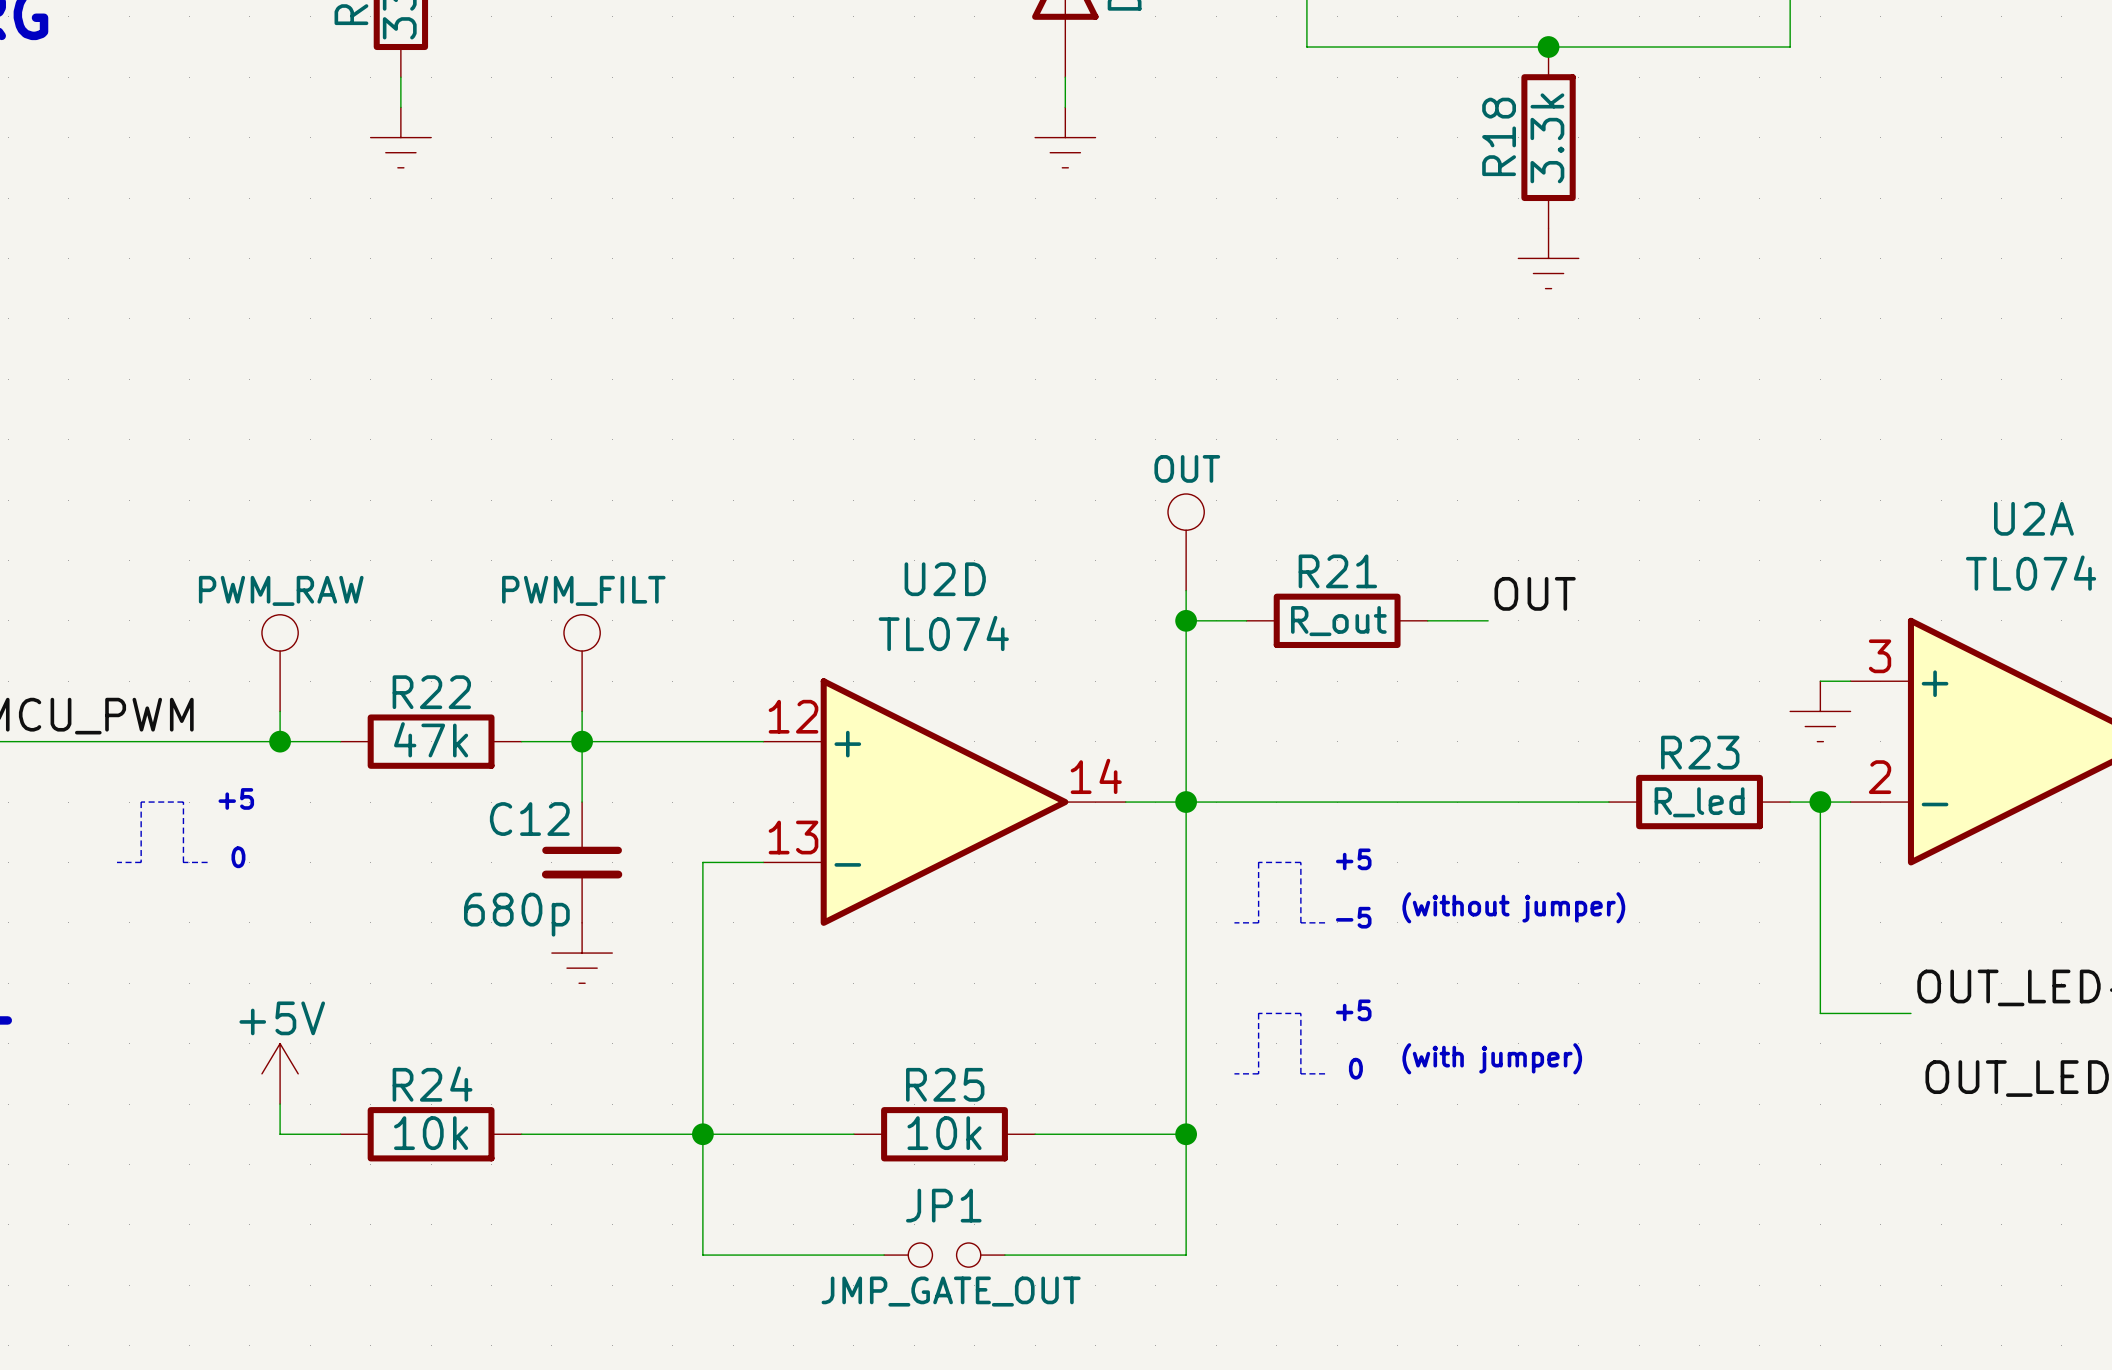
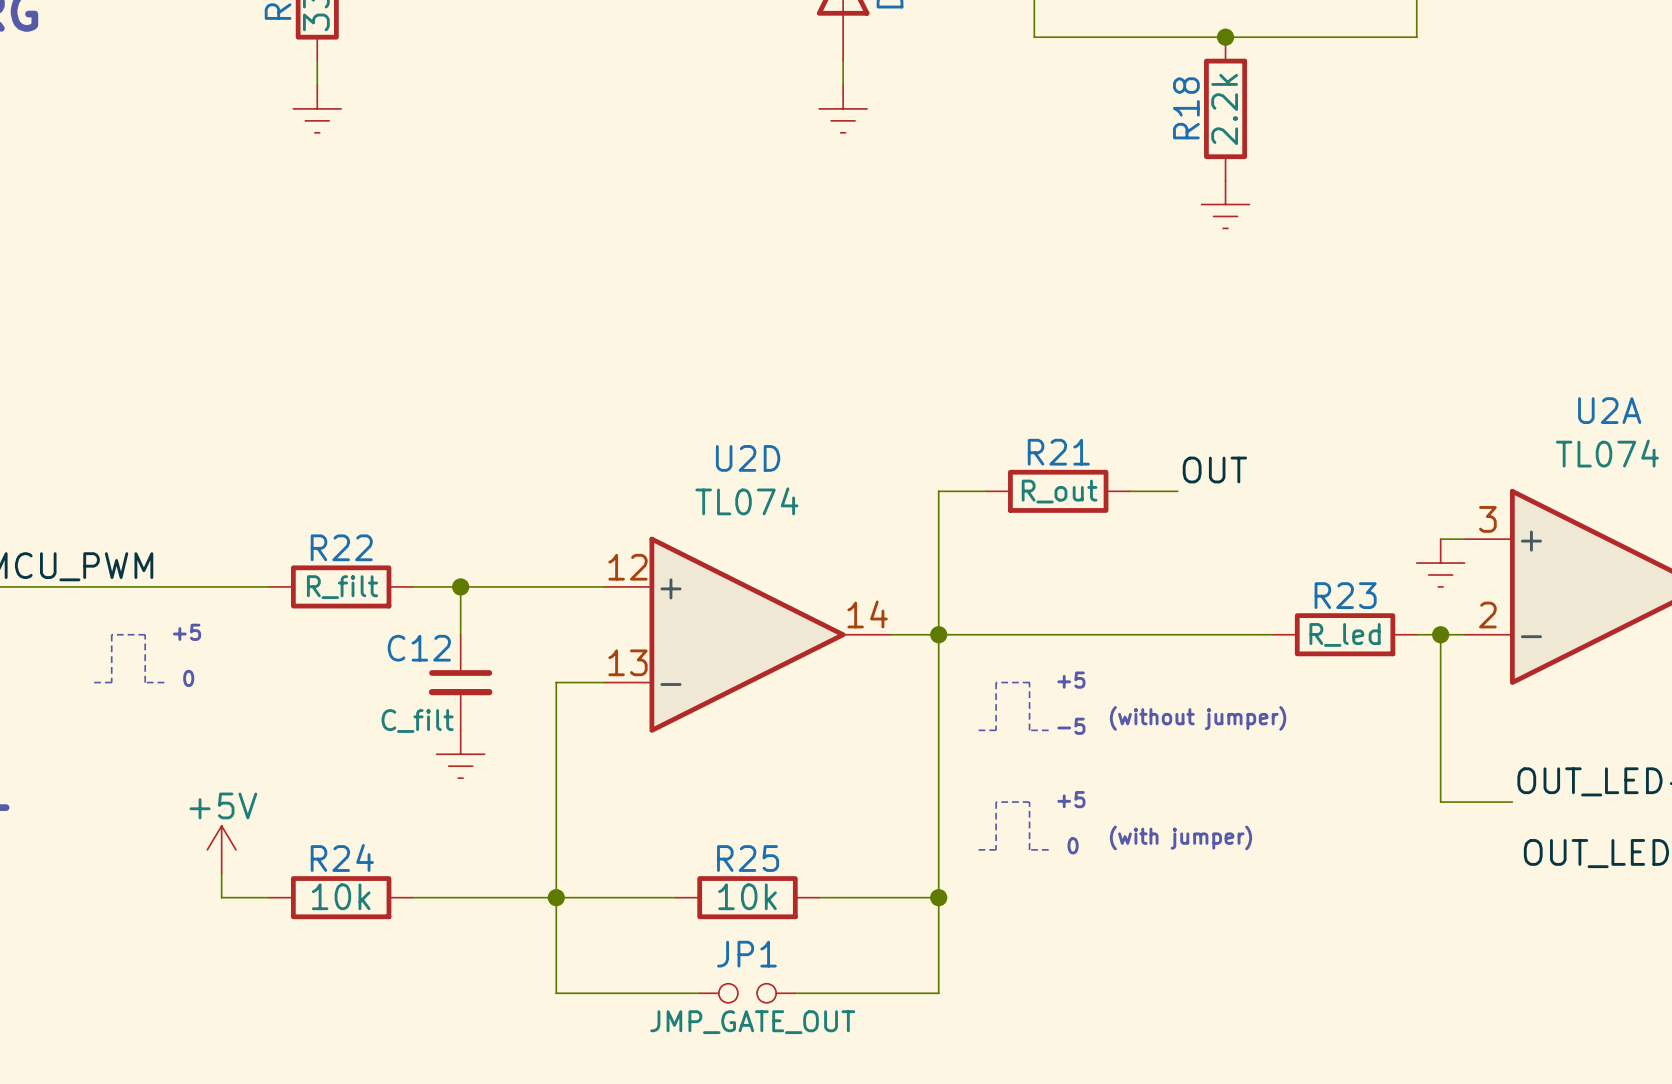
R18 value: 3.3k (1547, 138) -> 2.2k (1224, 109)
part: OUT (1186, 542) -> none
wire: (1186, 590) (1186, 620) -> none
junction: (1186, 620) -> none
part: PWM_RAW (280, 663) -> none
part: PWM_FILT (582, 663) -> none
wire: (280, 711) (280, 741) -> none
wire: (582, 711) (582, 741) -> none
R22 value: 47k (431, 739) -> R_filt (342, 587)
junction: (280, 741) -> none
C12 value: 680p (516, 914) -> C_filt (417, 720)

